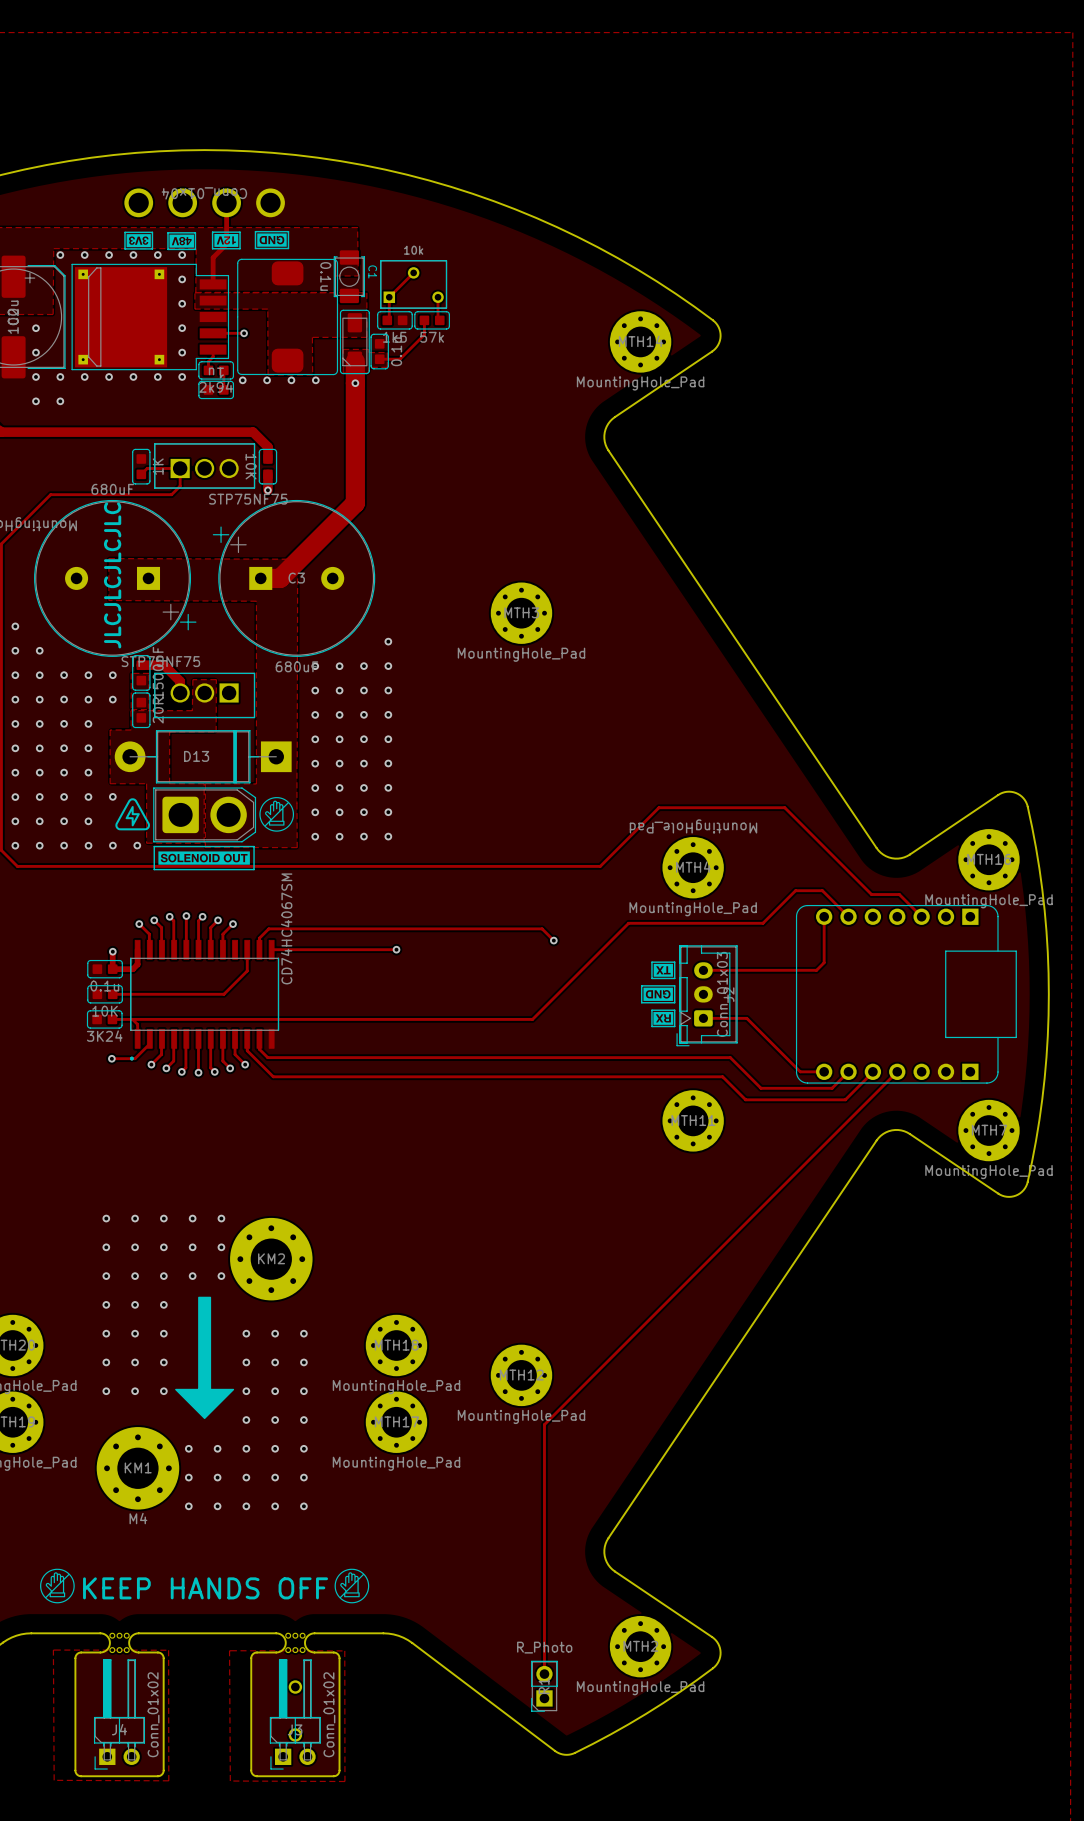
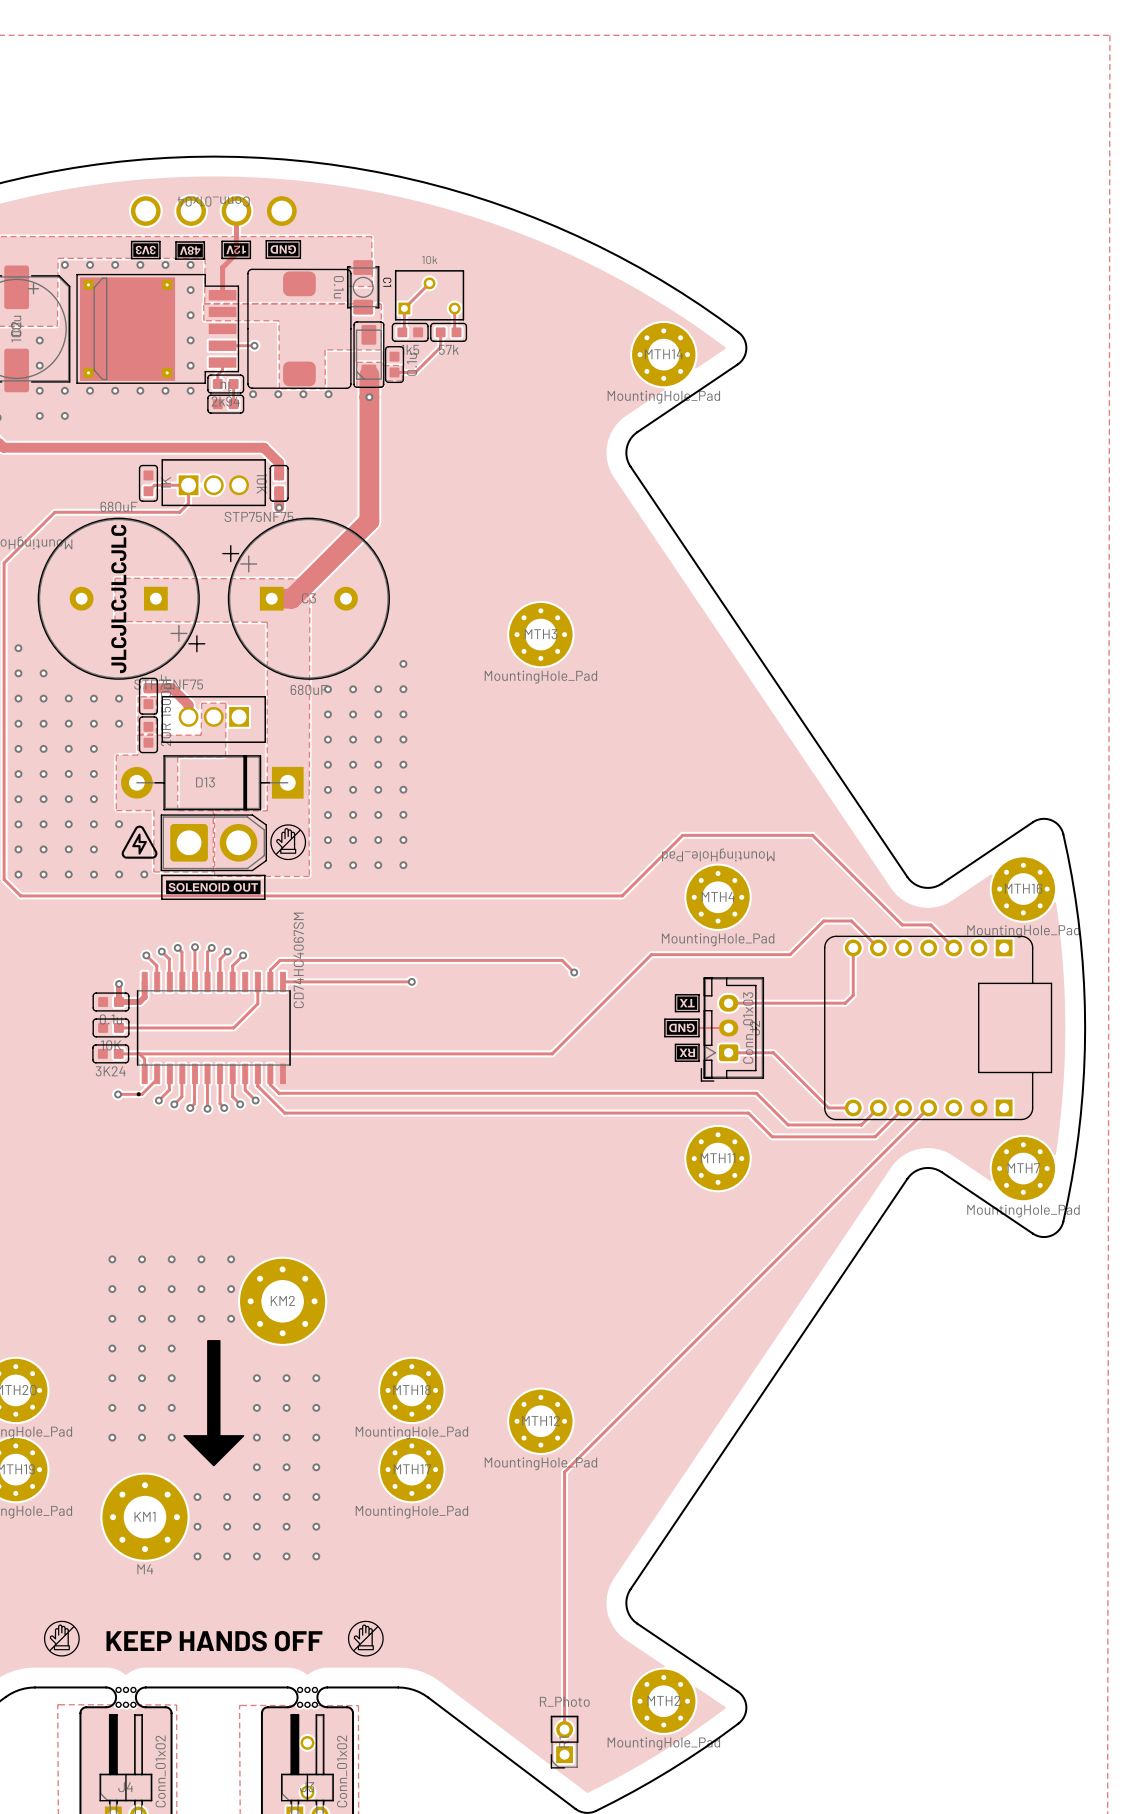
track: none -> (698, 1027) (728, 1028)

